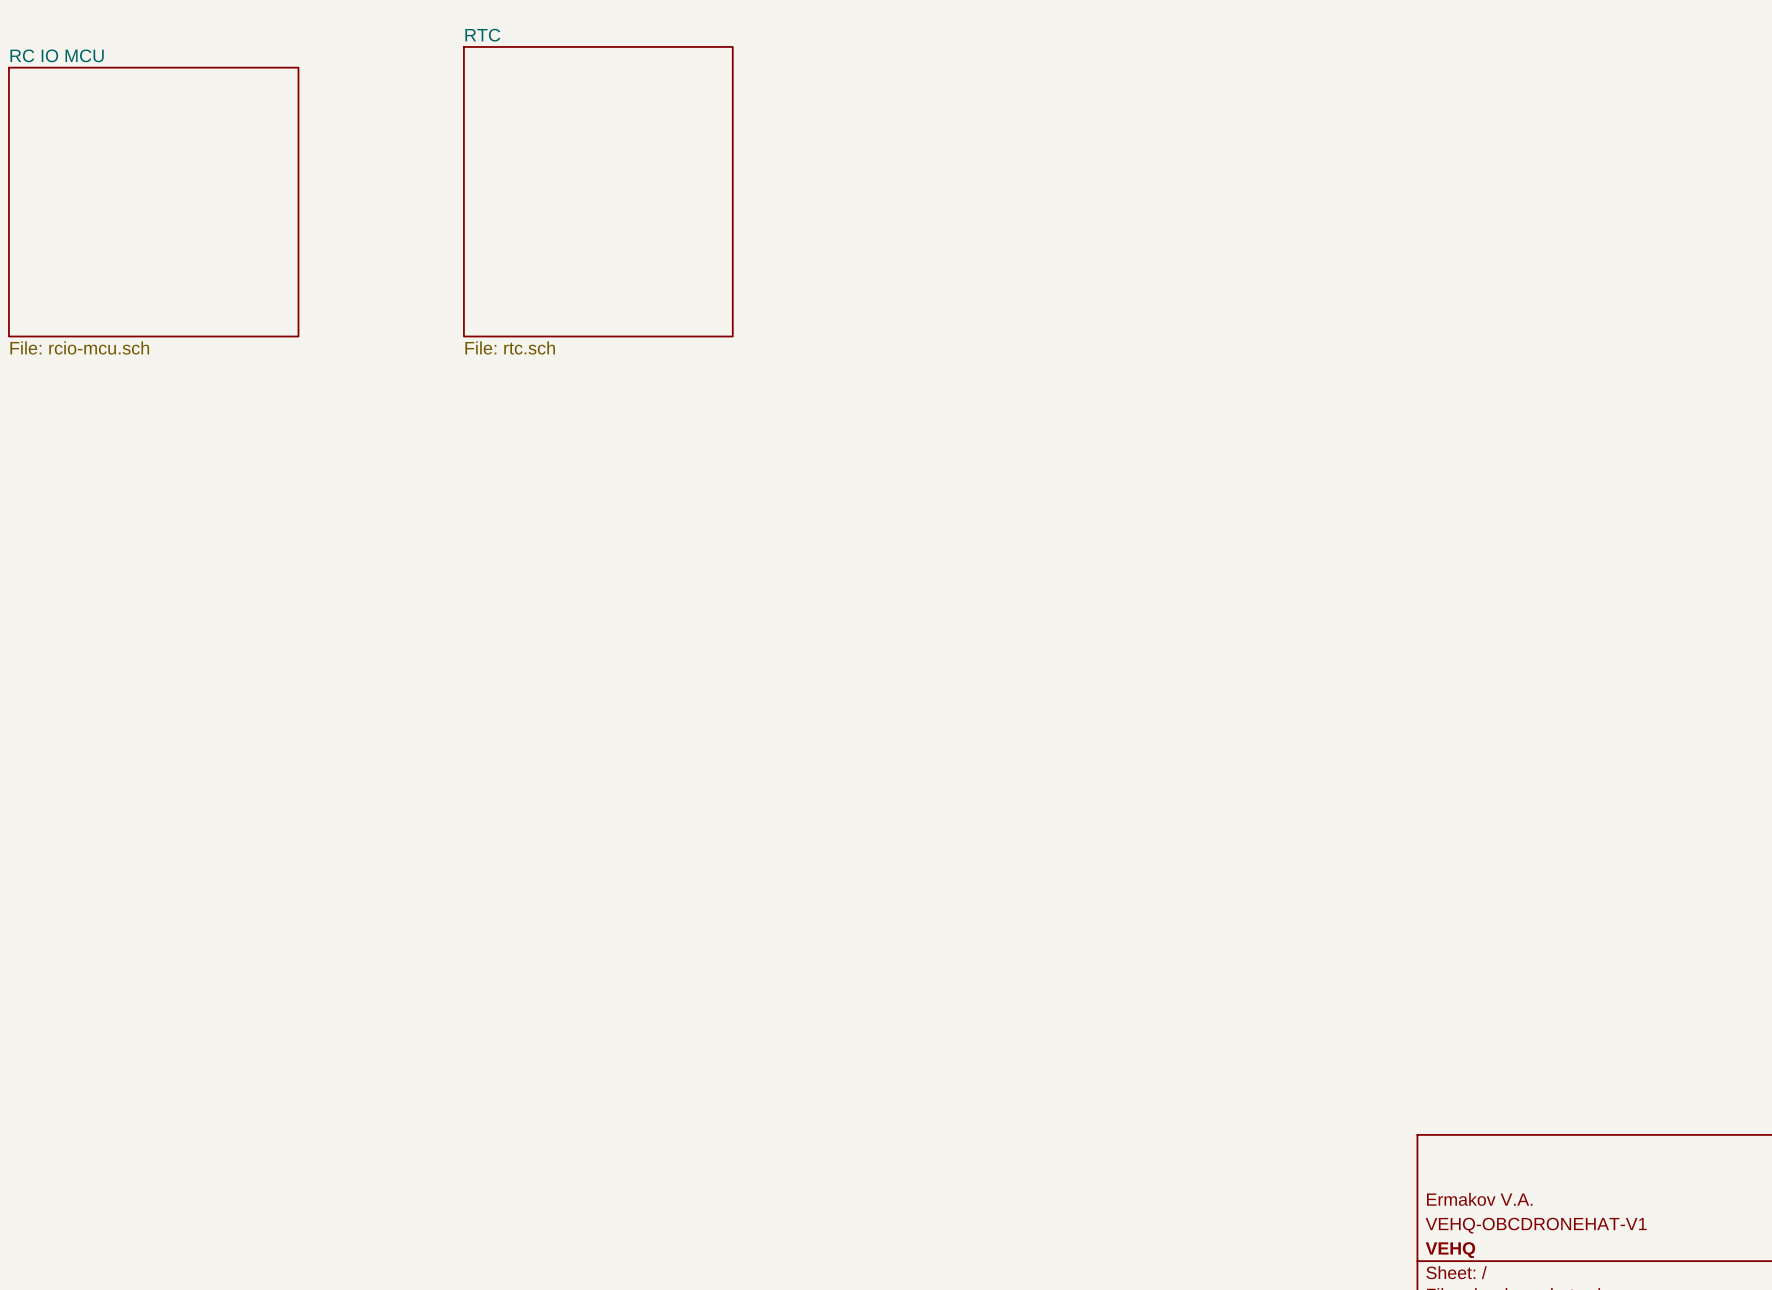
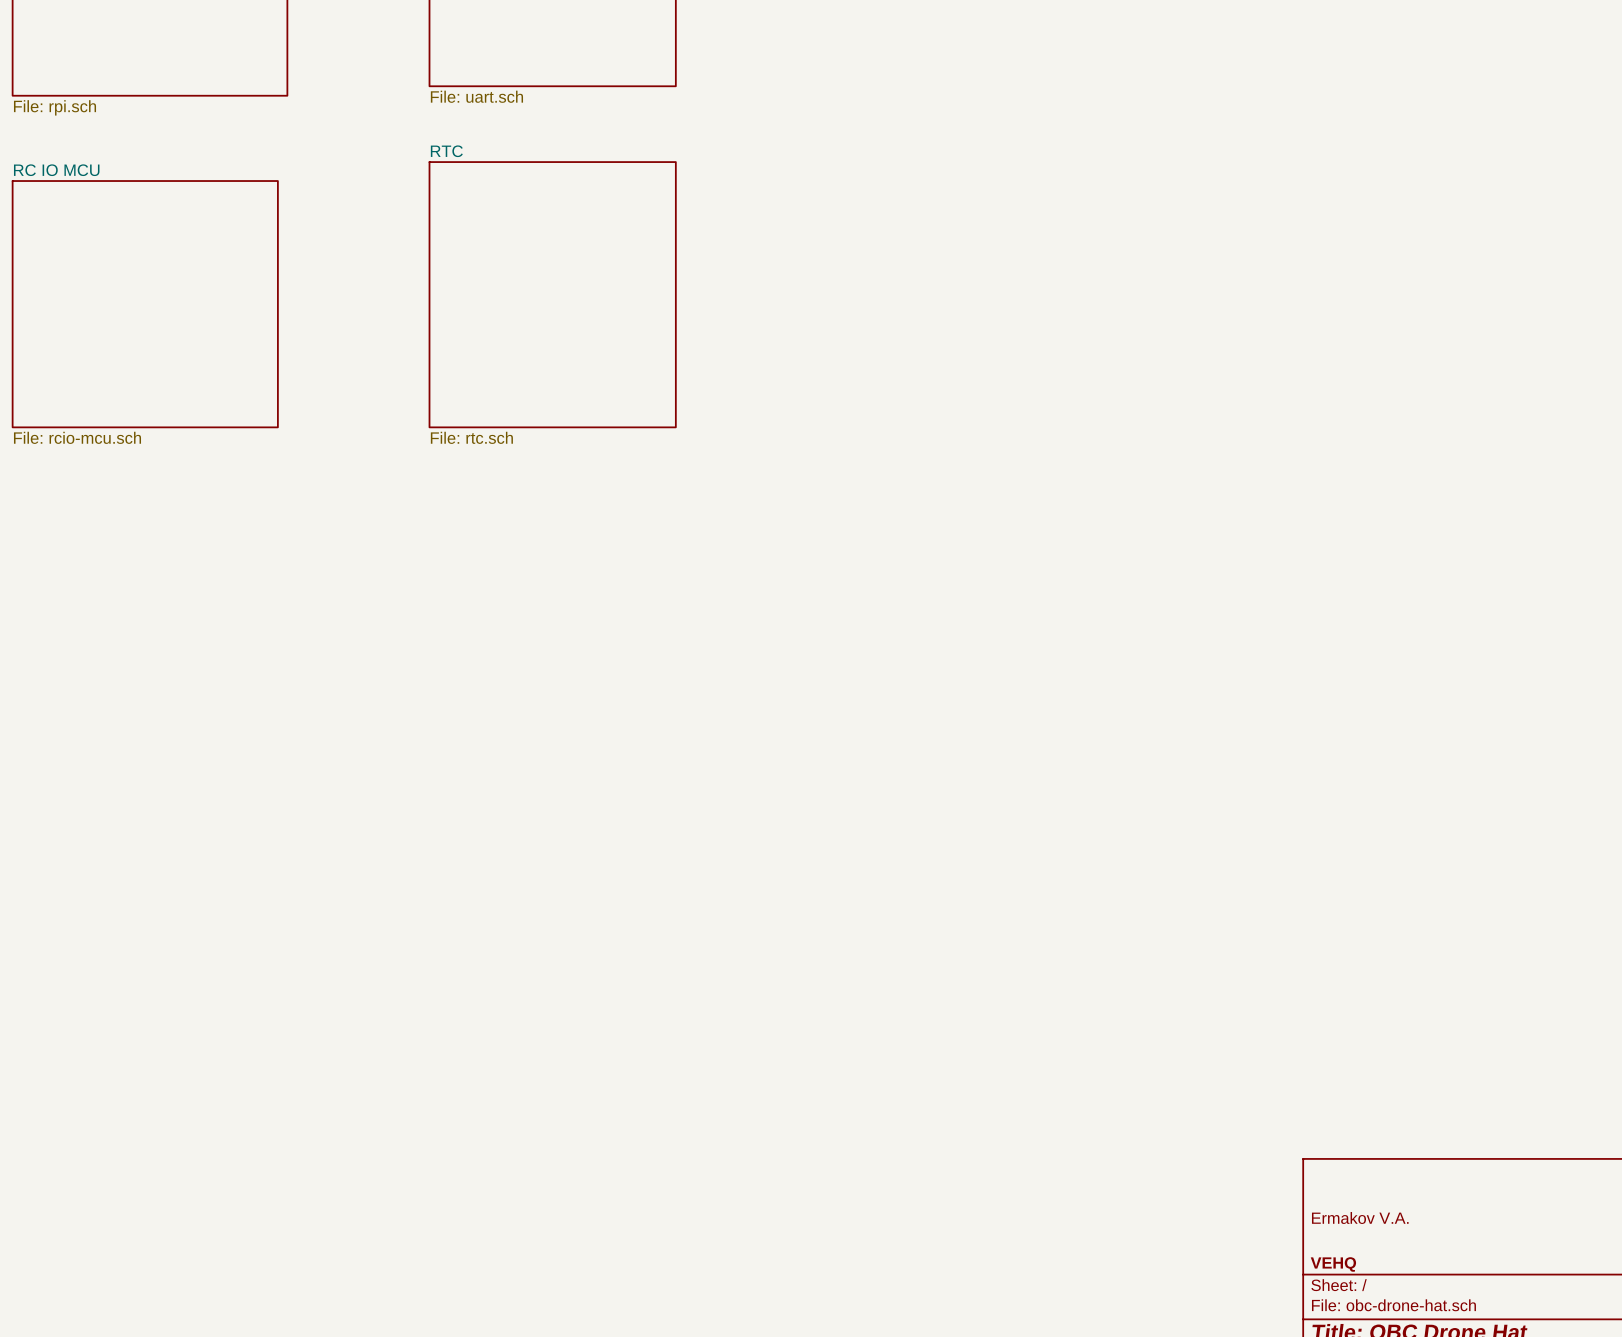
title block: VEHQ-OBCDRONEHAT-V1 (1536, 1225) -> none

